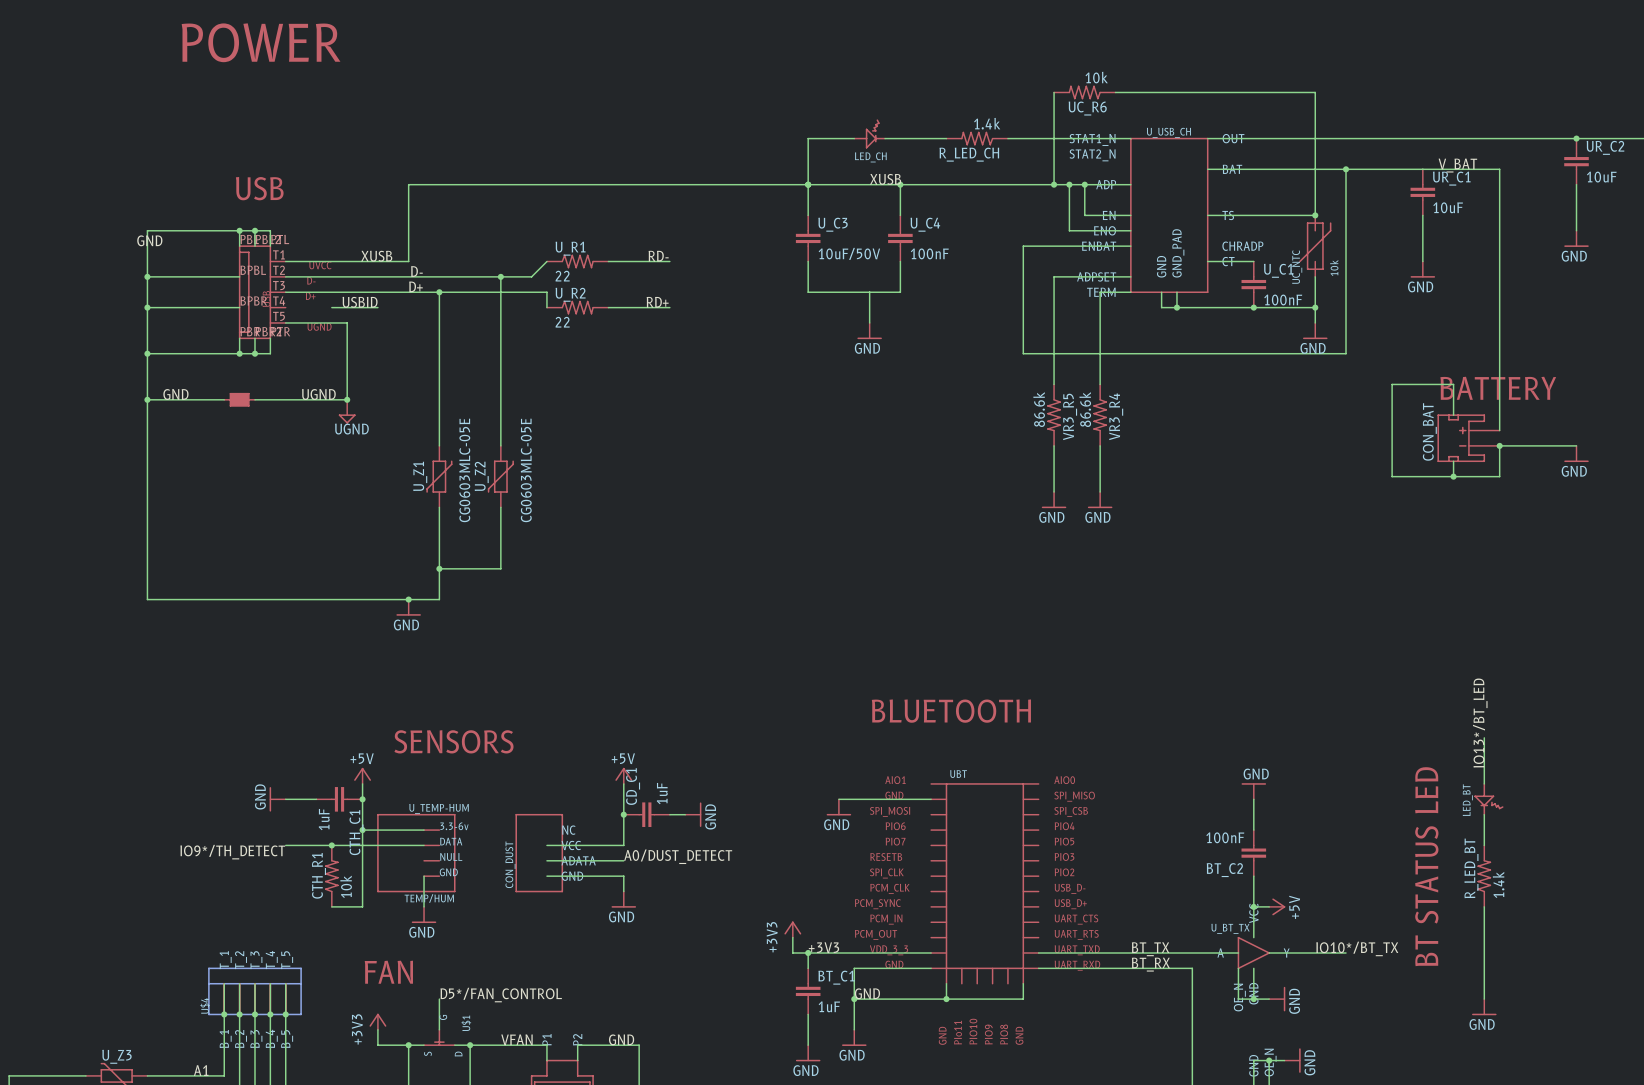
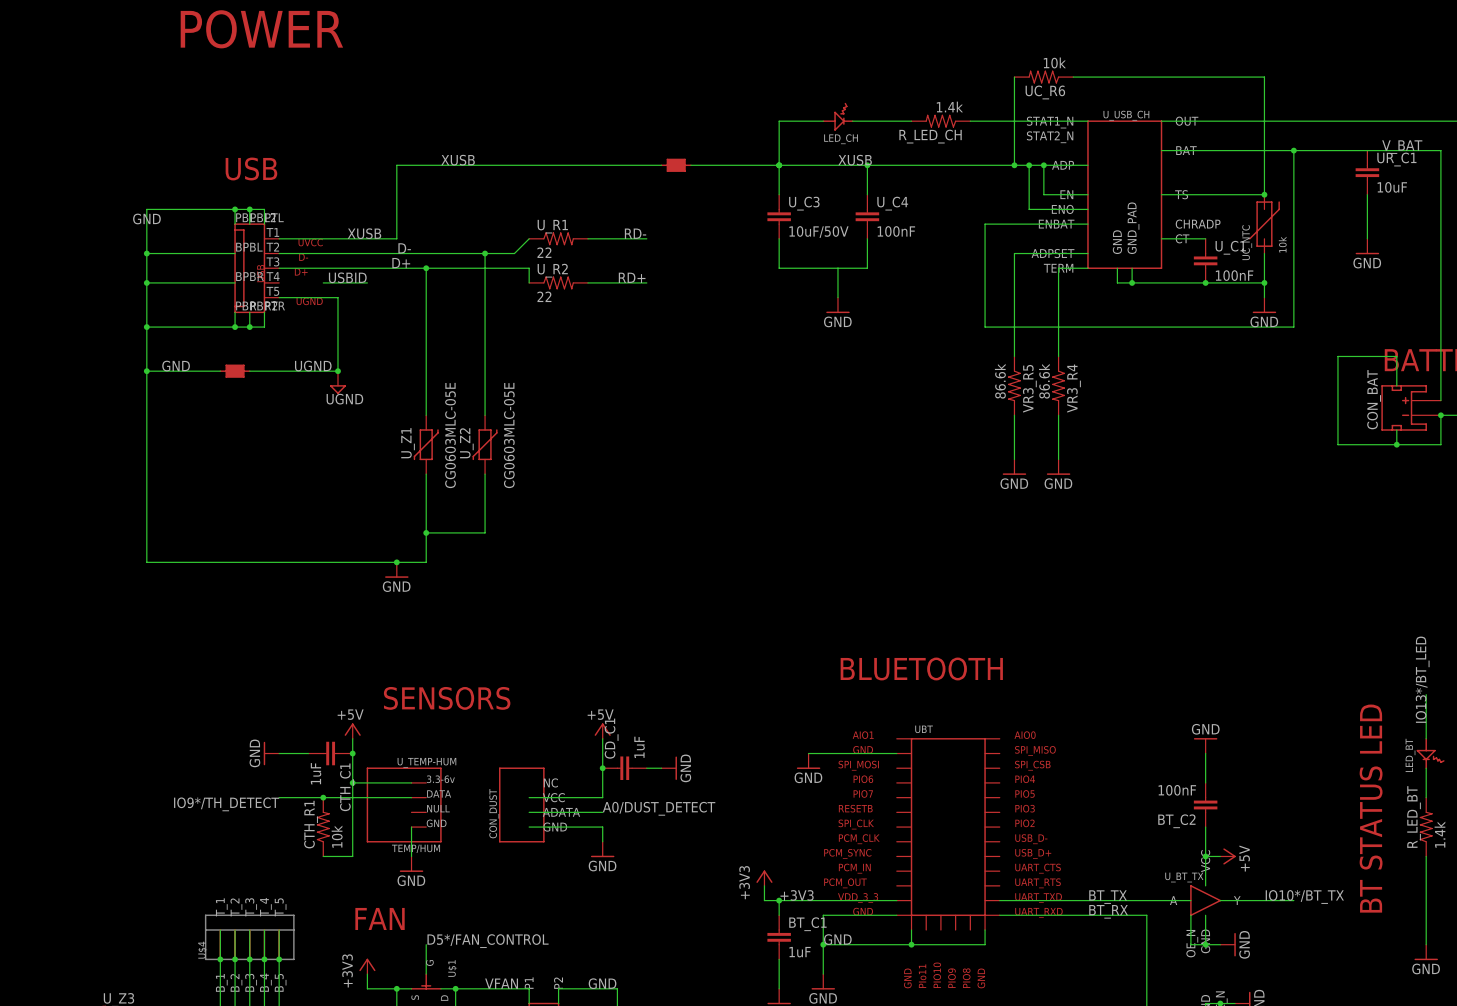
label: none -> XUSB (458, 160)
part: none -> (676, 165)

